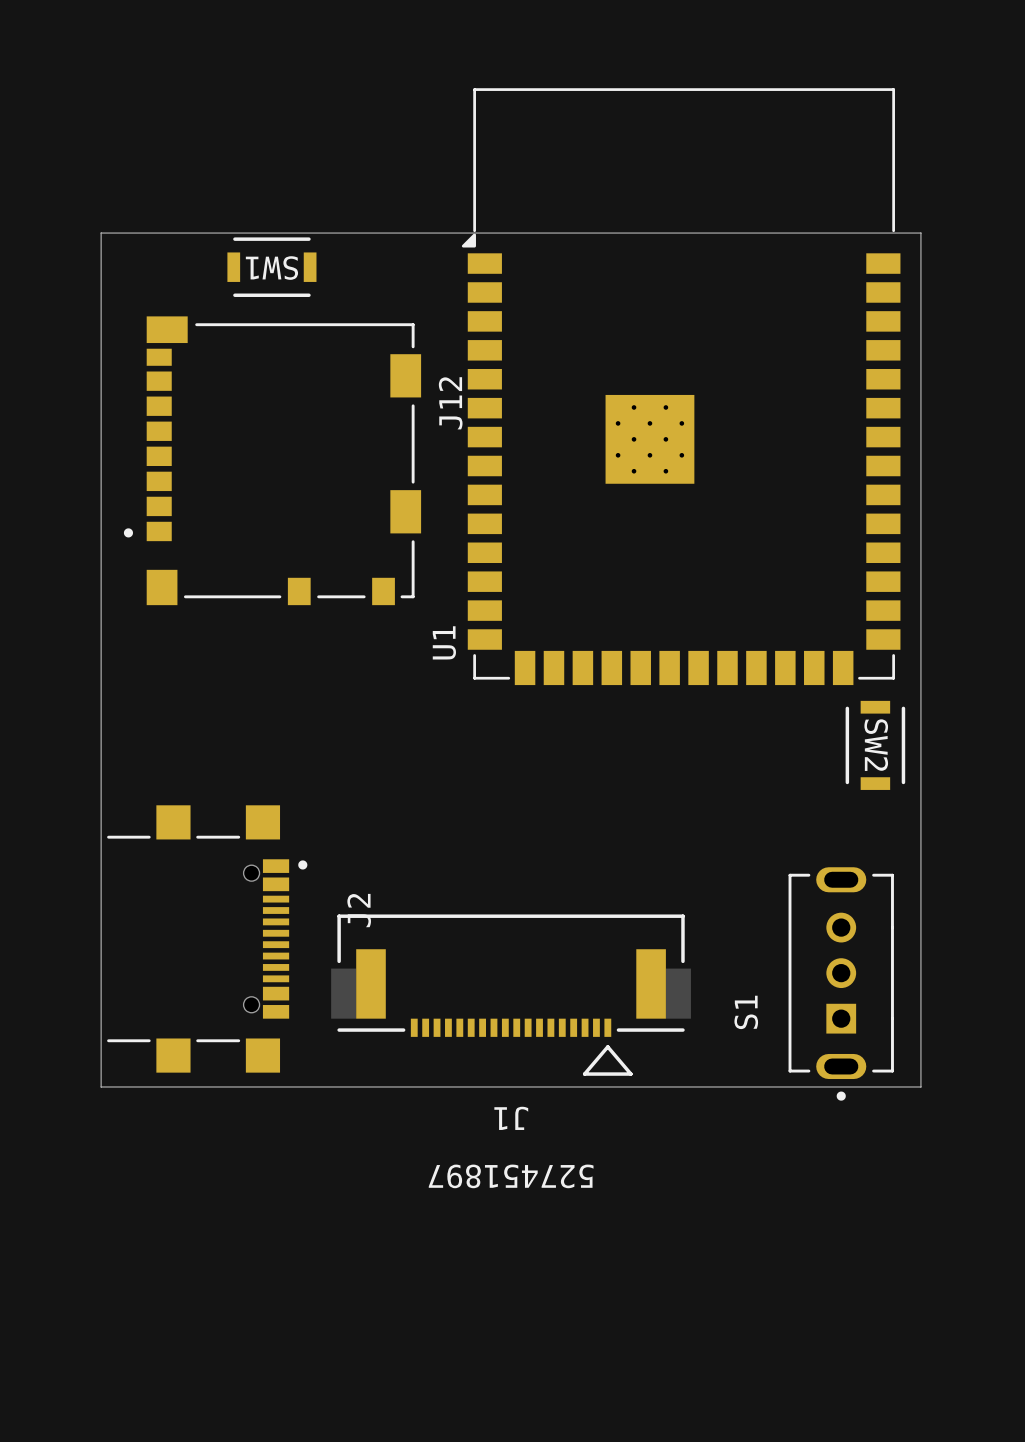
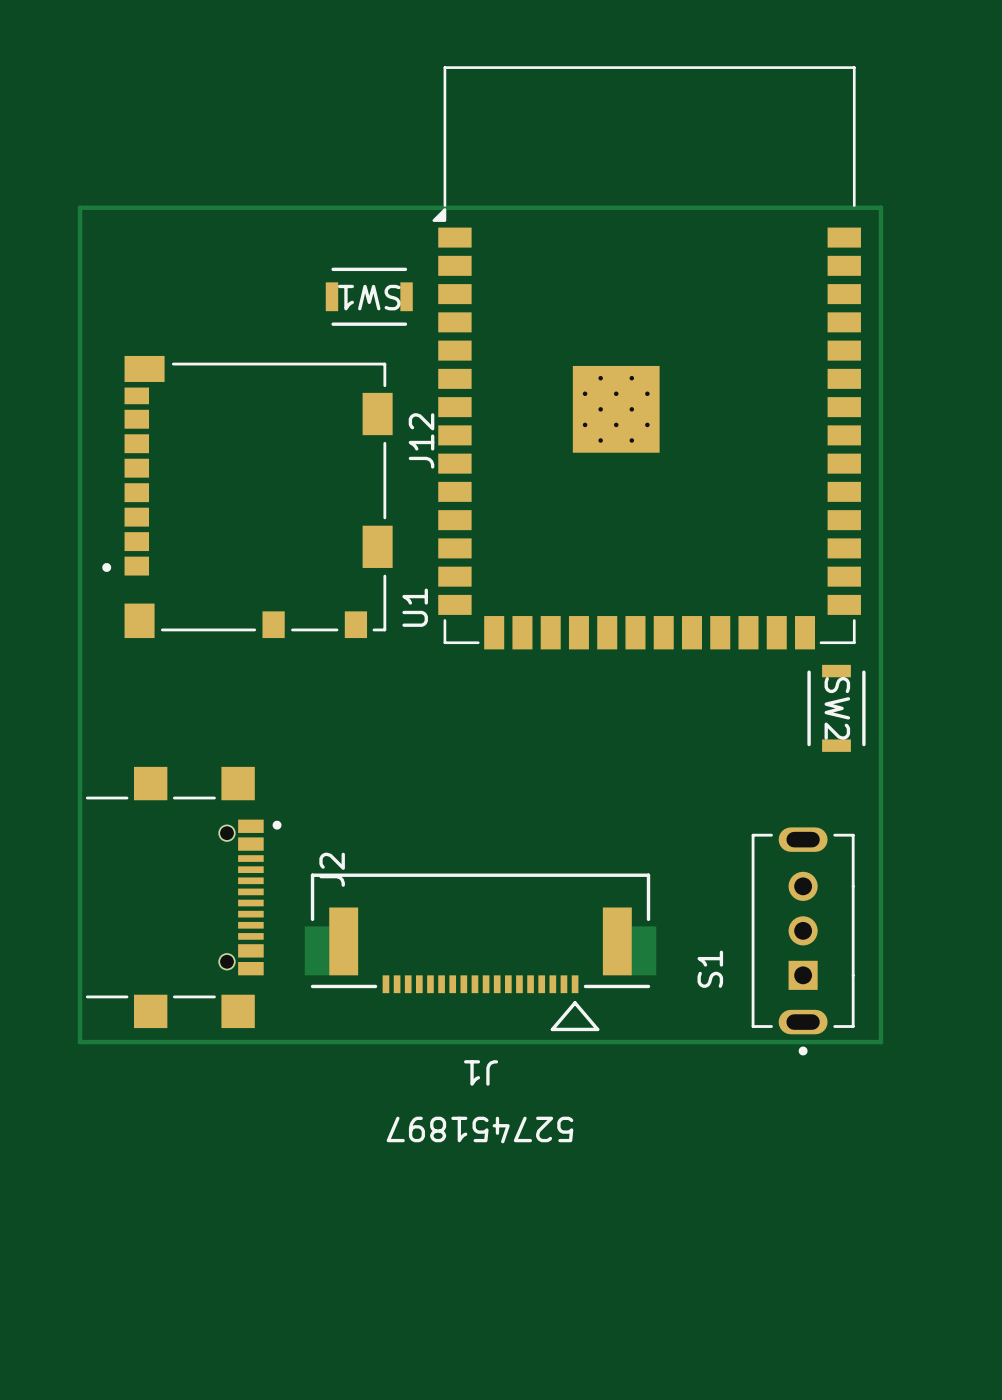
board edge: (101, 233) (920, 233) (920, 1086) (101, 1086) (101, 233) -> none
track: none -> (80, 207) (880, 207) (880, 1042) (80, 1042) (80, 207)
SW1 position: (271, 267) -> (369, 296)
J12 position: (272, 460) -> (247, 497)

